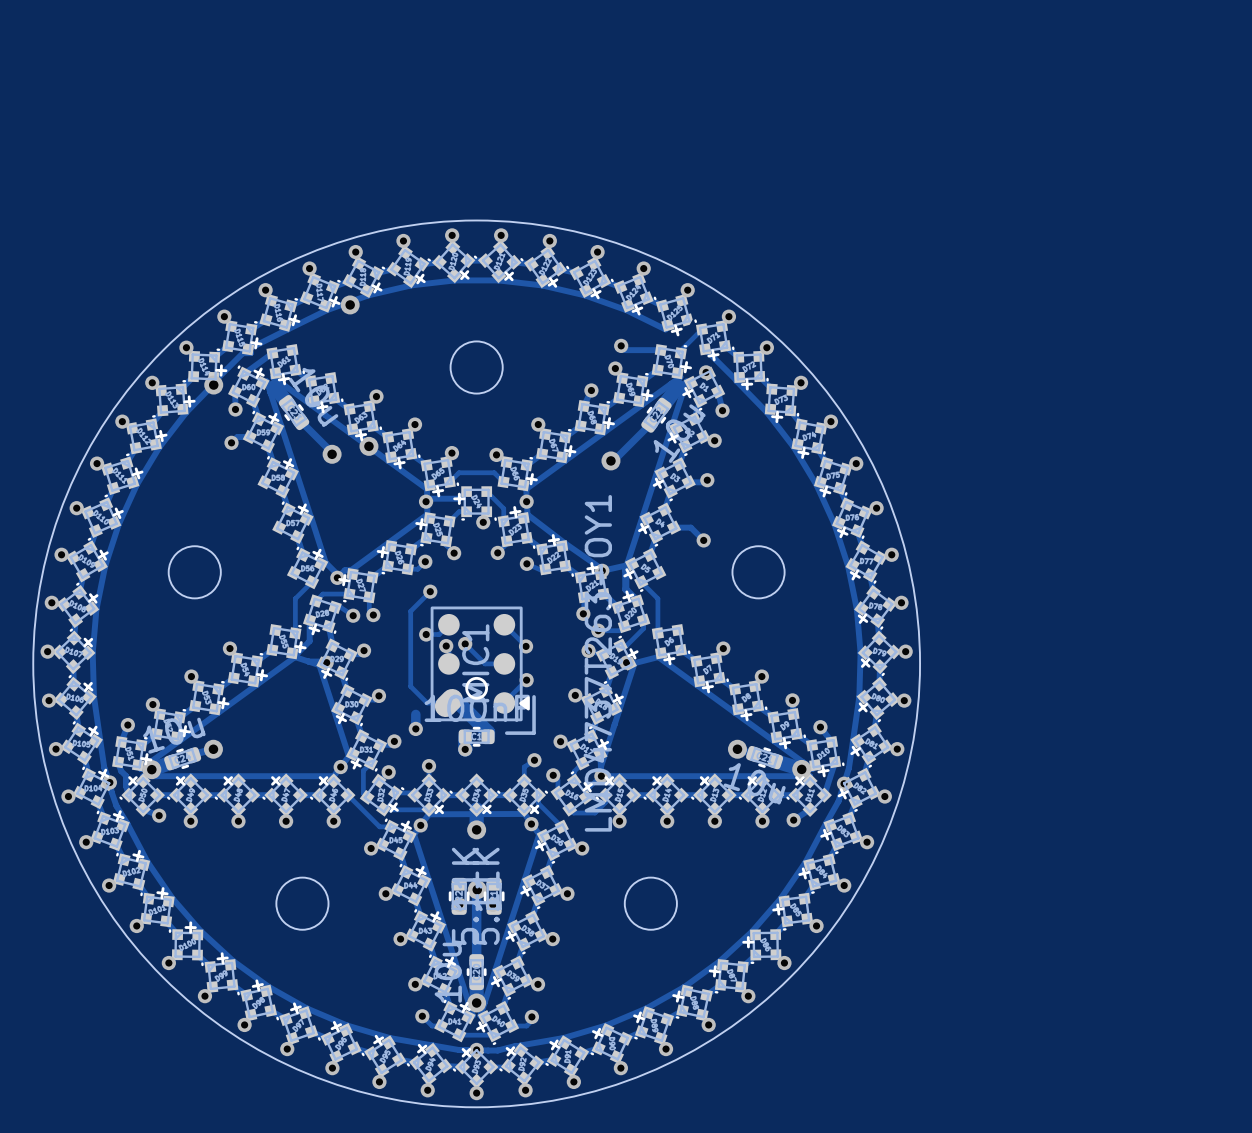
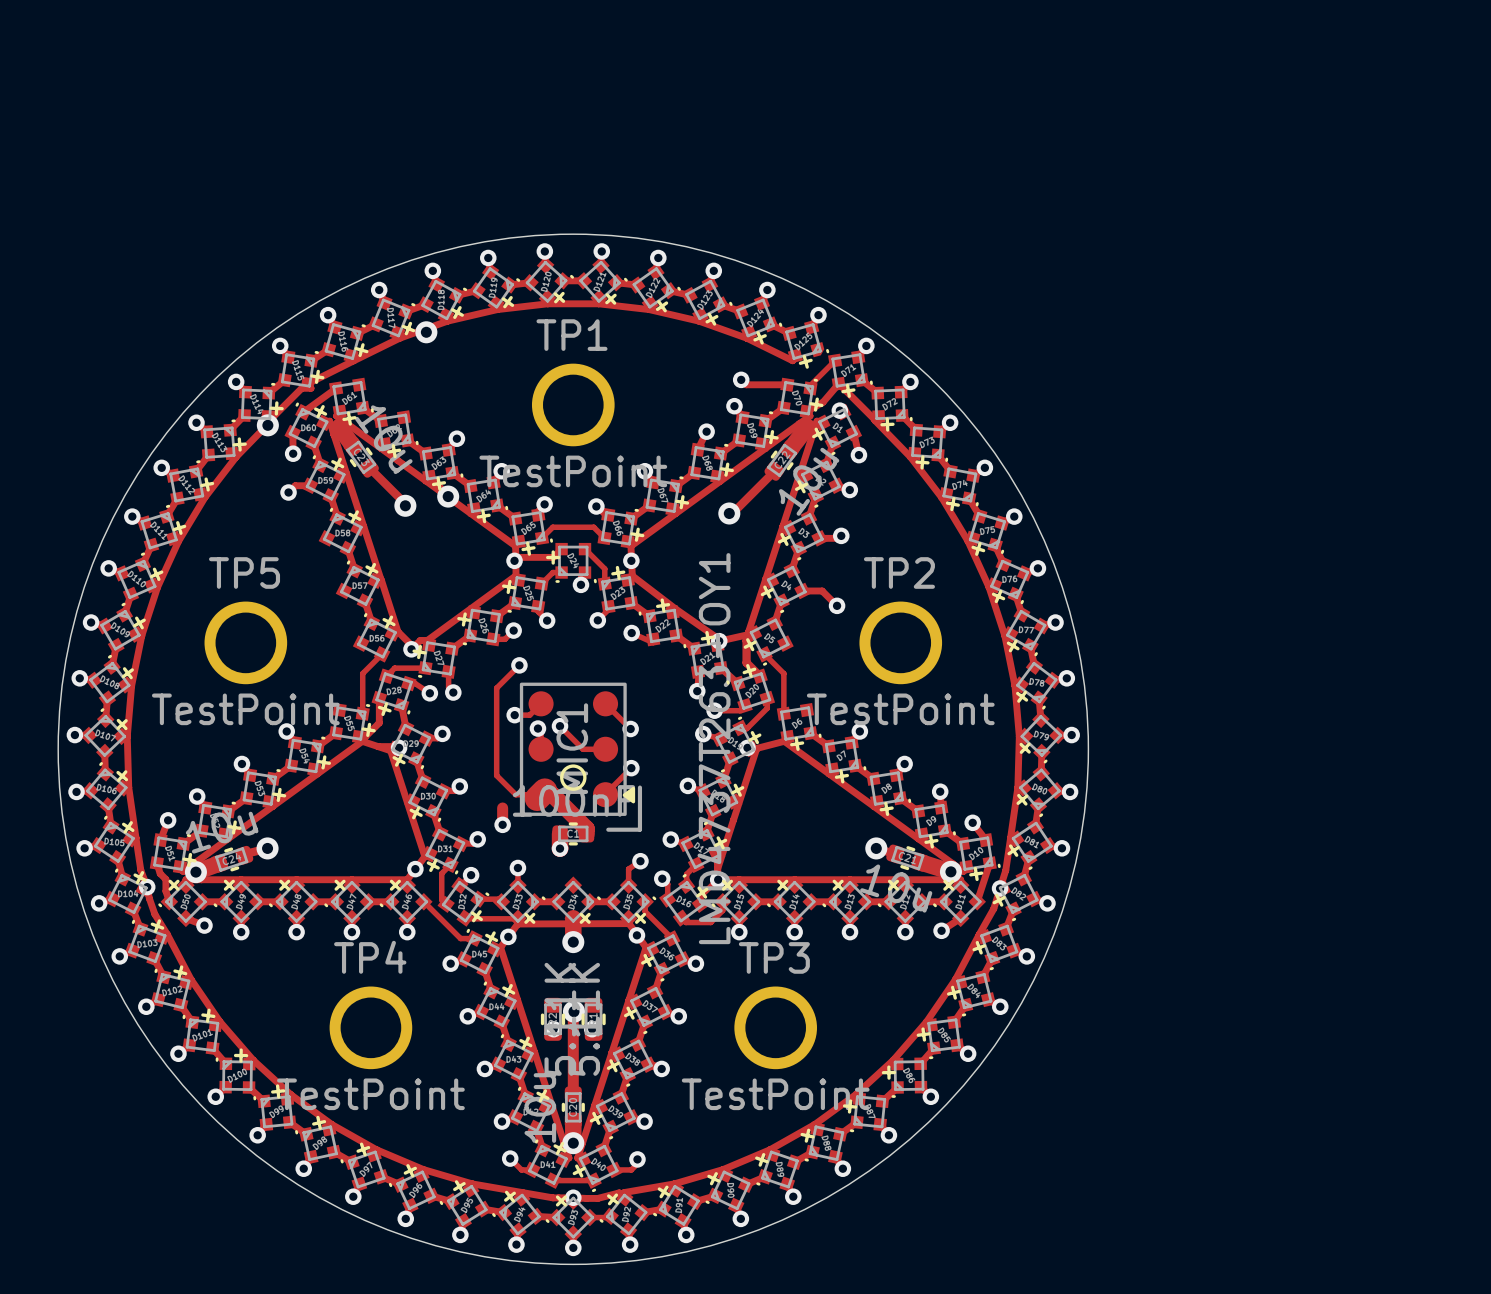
round board edge: [449, 340, 504, 395] -> none
track: none -> (838, 383) (823, 402) (806, 411)
TP1: none -> TestPoint (573, 404)
round board edge: [168, 545, 222, 599] -> none
round board edge: [731, 545, 786, 599] -> none
TP5: none -> TestPoint (245, 642)
TP2: none -> TestPoint (900, 642)
round board edge: [275, 877, 330, 931] -> none
round board edge: [624, 877, 678, 931] -> none
TP4: none -> TestPoint (370, 1027)
TP3: none -> TestPoint (775, 1027)

